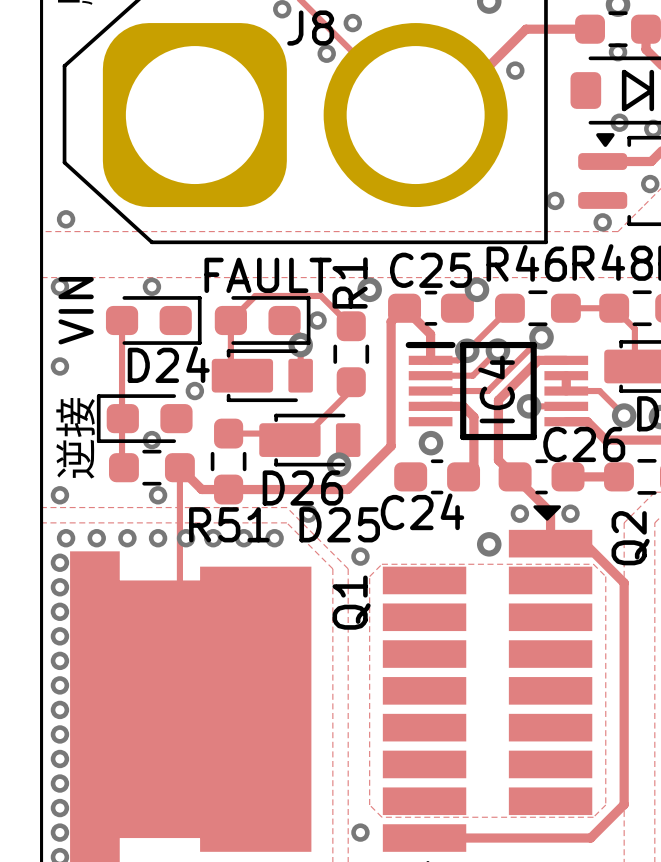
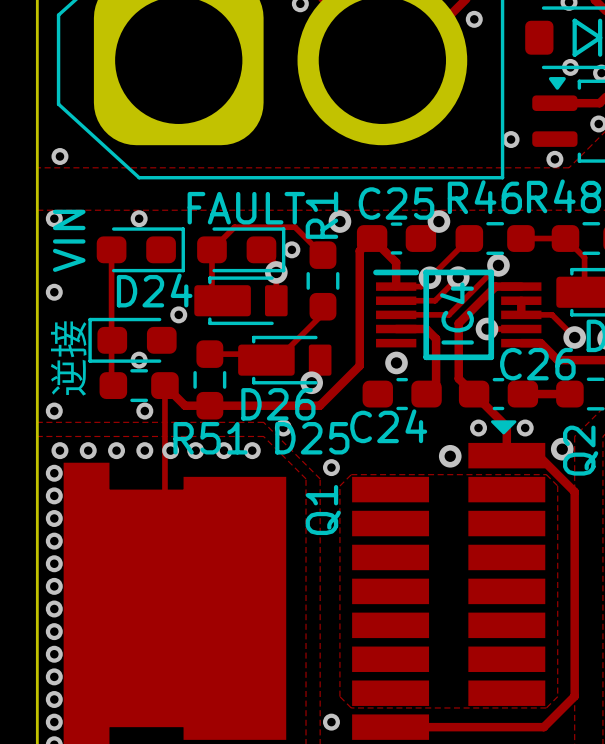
via: none -> (562, 449)

